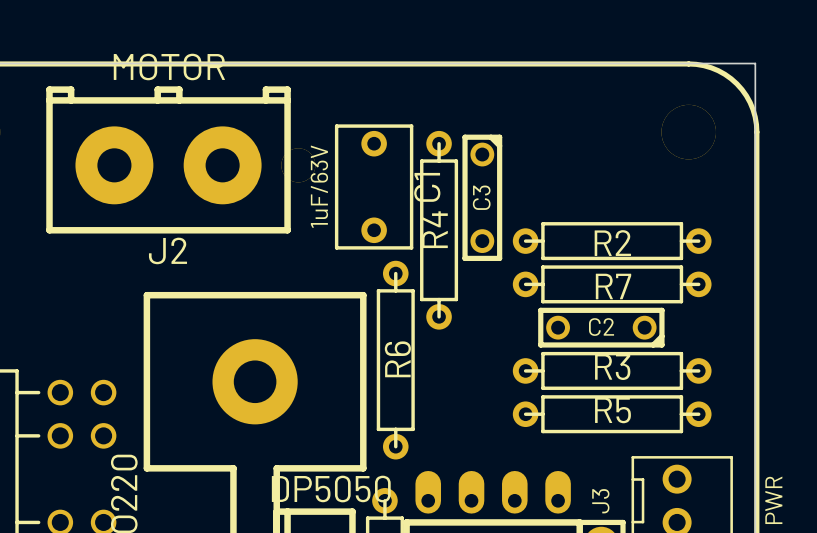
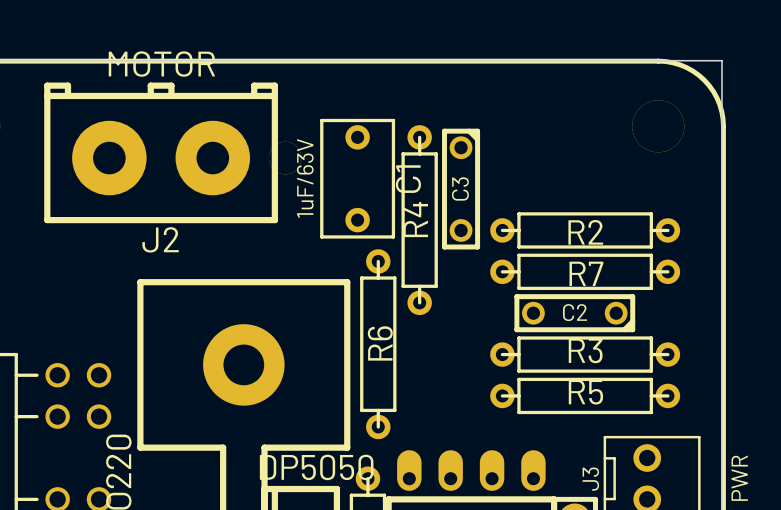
J3 name position: J3 (600, 501) -> J3 (590, 479)

